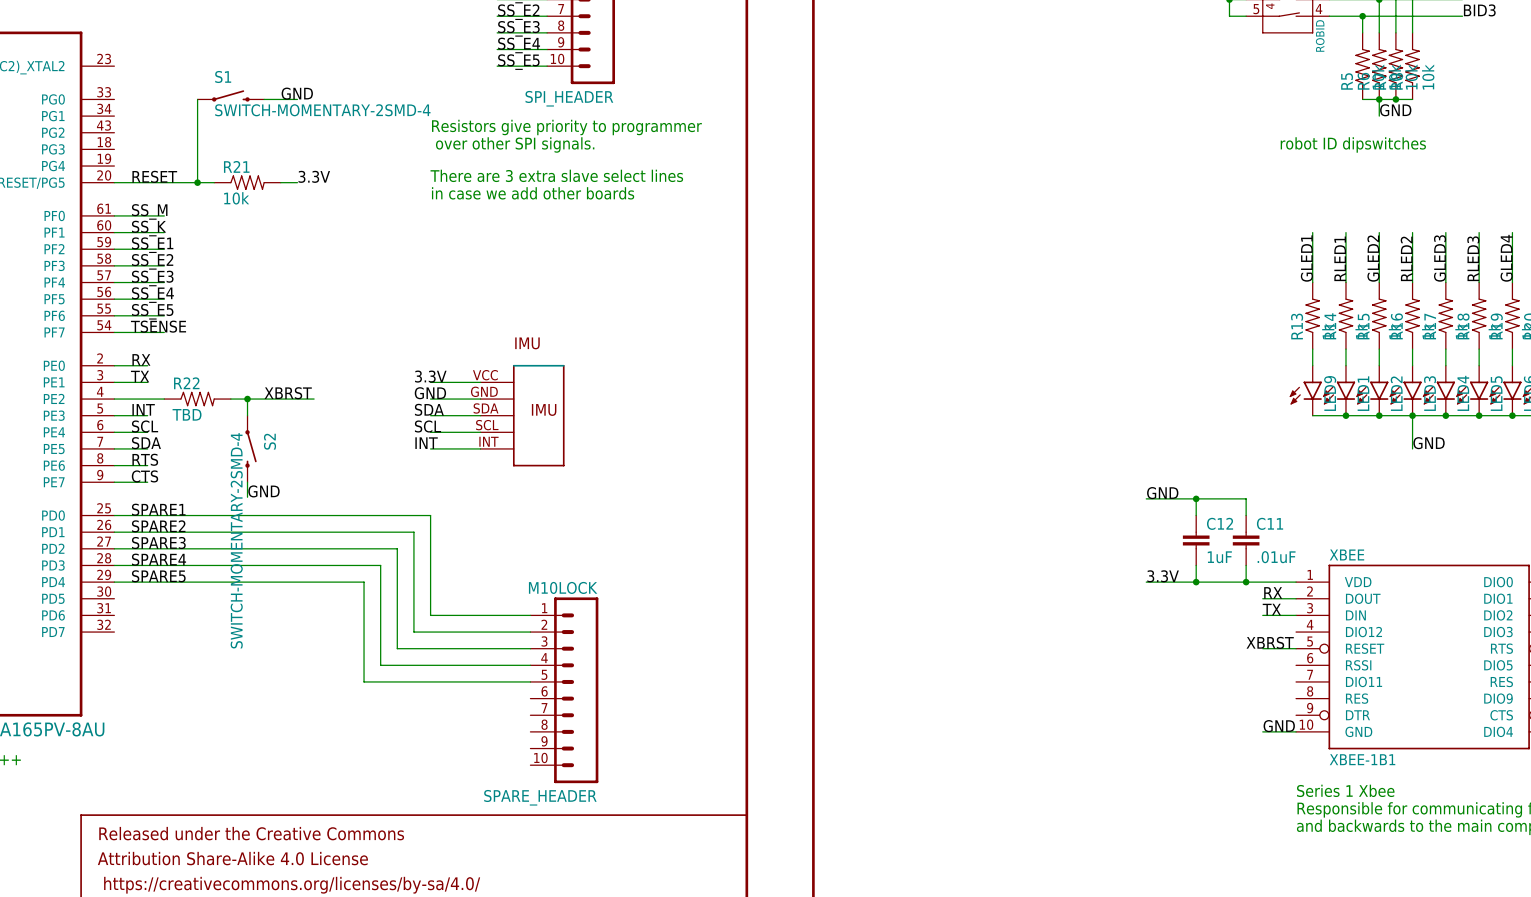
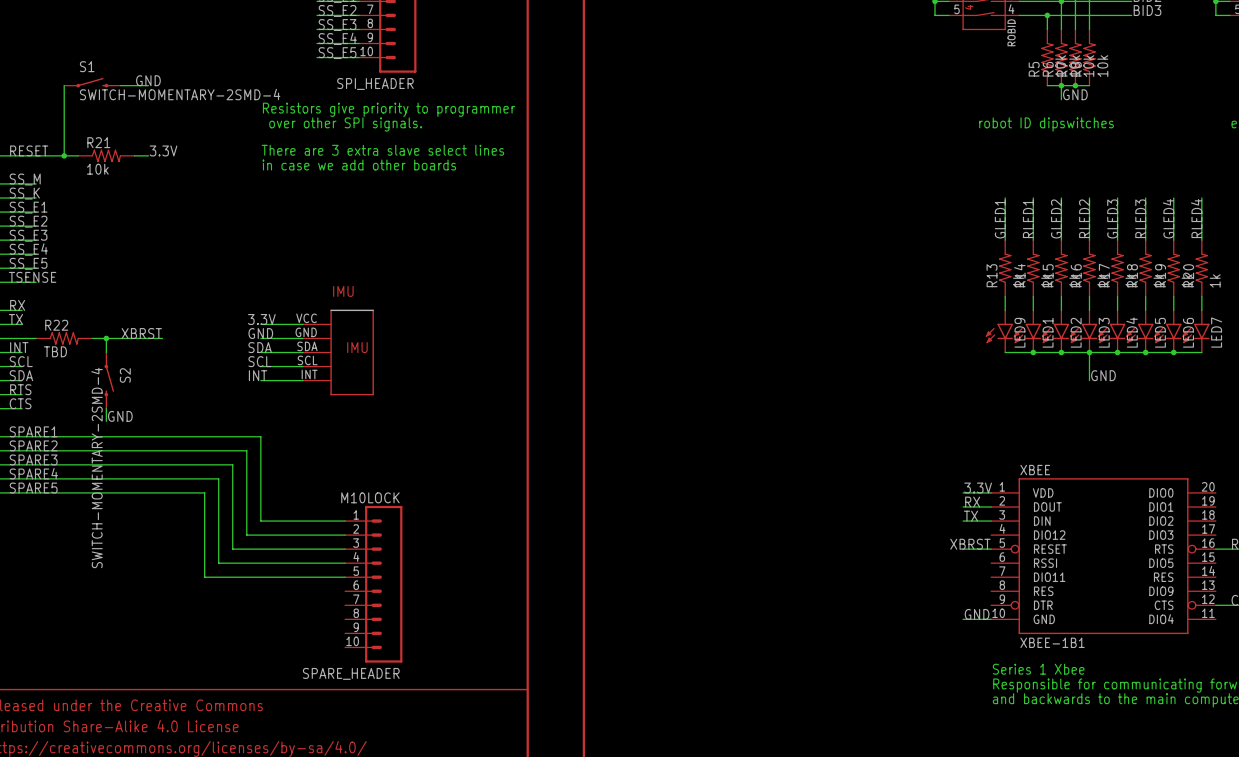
label: GND (1162, 493) -> none
wire: (1146, 498) (1246, 498) (1246, 515) -> none
wire: (1196, 498) (1196, 515) -> none
junction: (1196, 498) -> none
C12: 1uF (1196, 540) -> none
C11: .01uF (1246, 540) -> none
wire: (1196, 565) (1196, 582) -> none
wire: (1246, 565) (1246, 582) -> none
label position: 3.3V (1163, 576) -> 3.3V (978, 488)
wire: (1146, 582) (1262, 582) -> none
junction: (1196, 582) -> none
junction: (1246, 582) -> none

